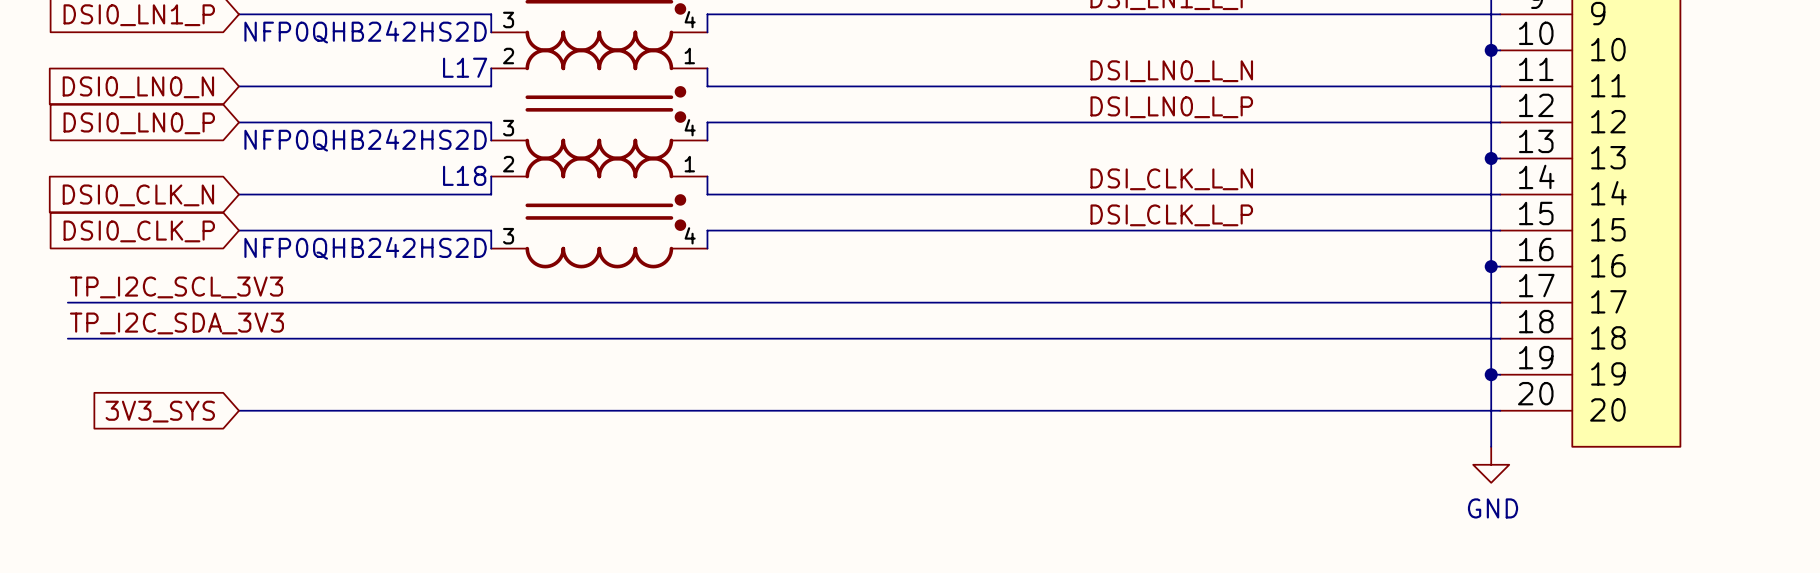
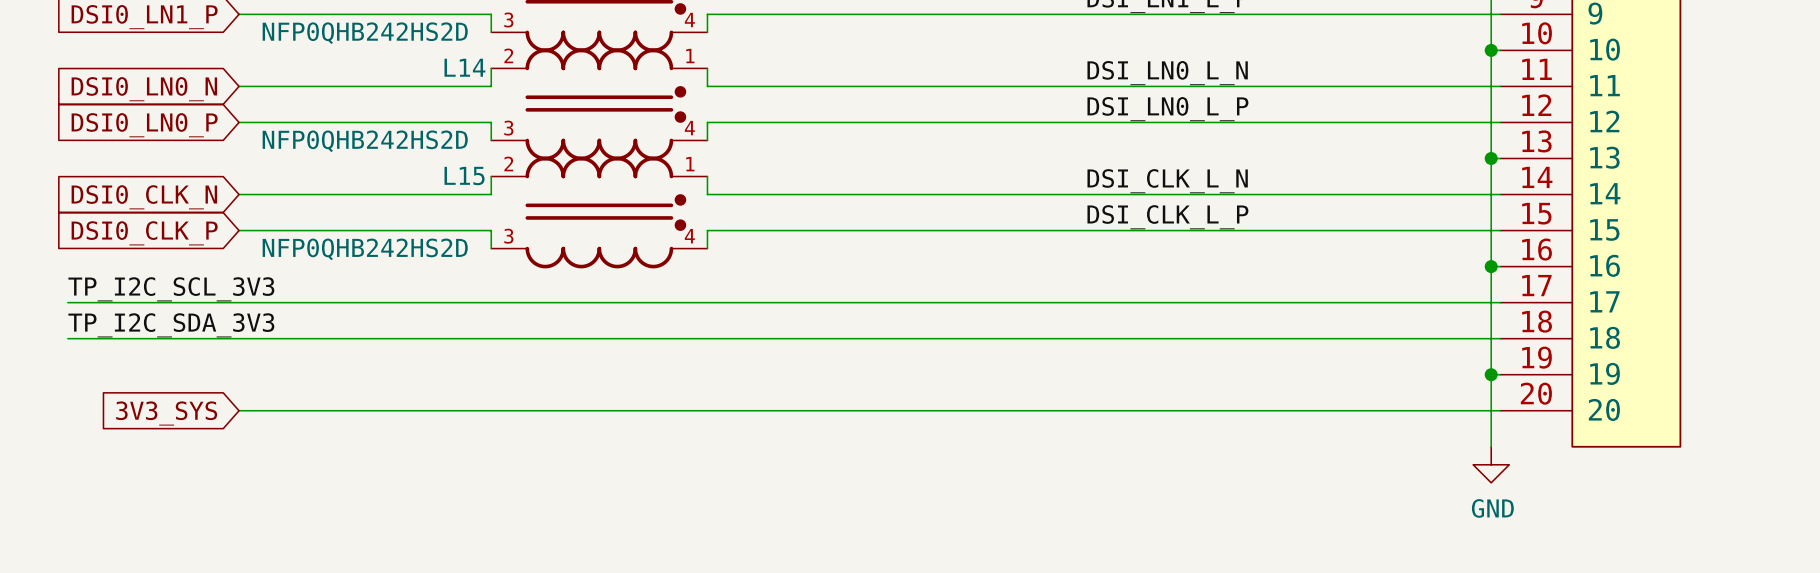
L17 name: L17 (465, 67) -> L14 (464, 67)
L18 name: L18 (464, 175) -> L15 (464, 176)

